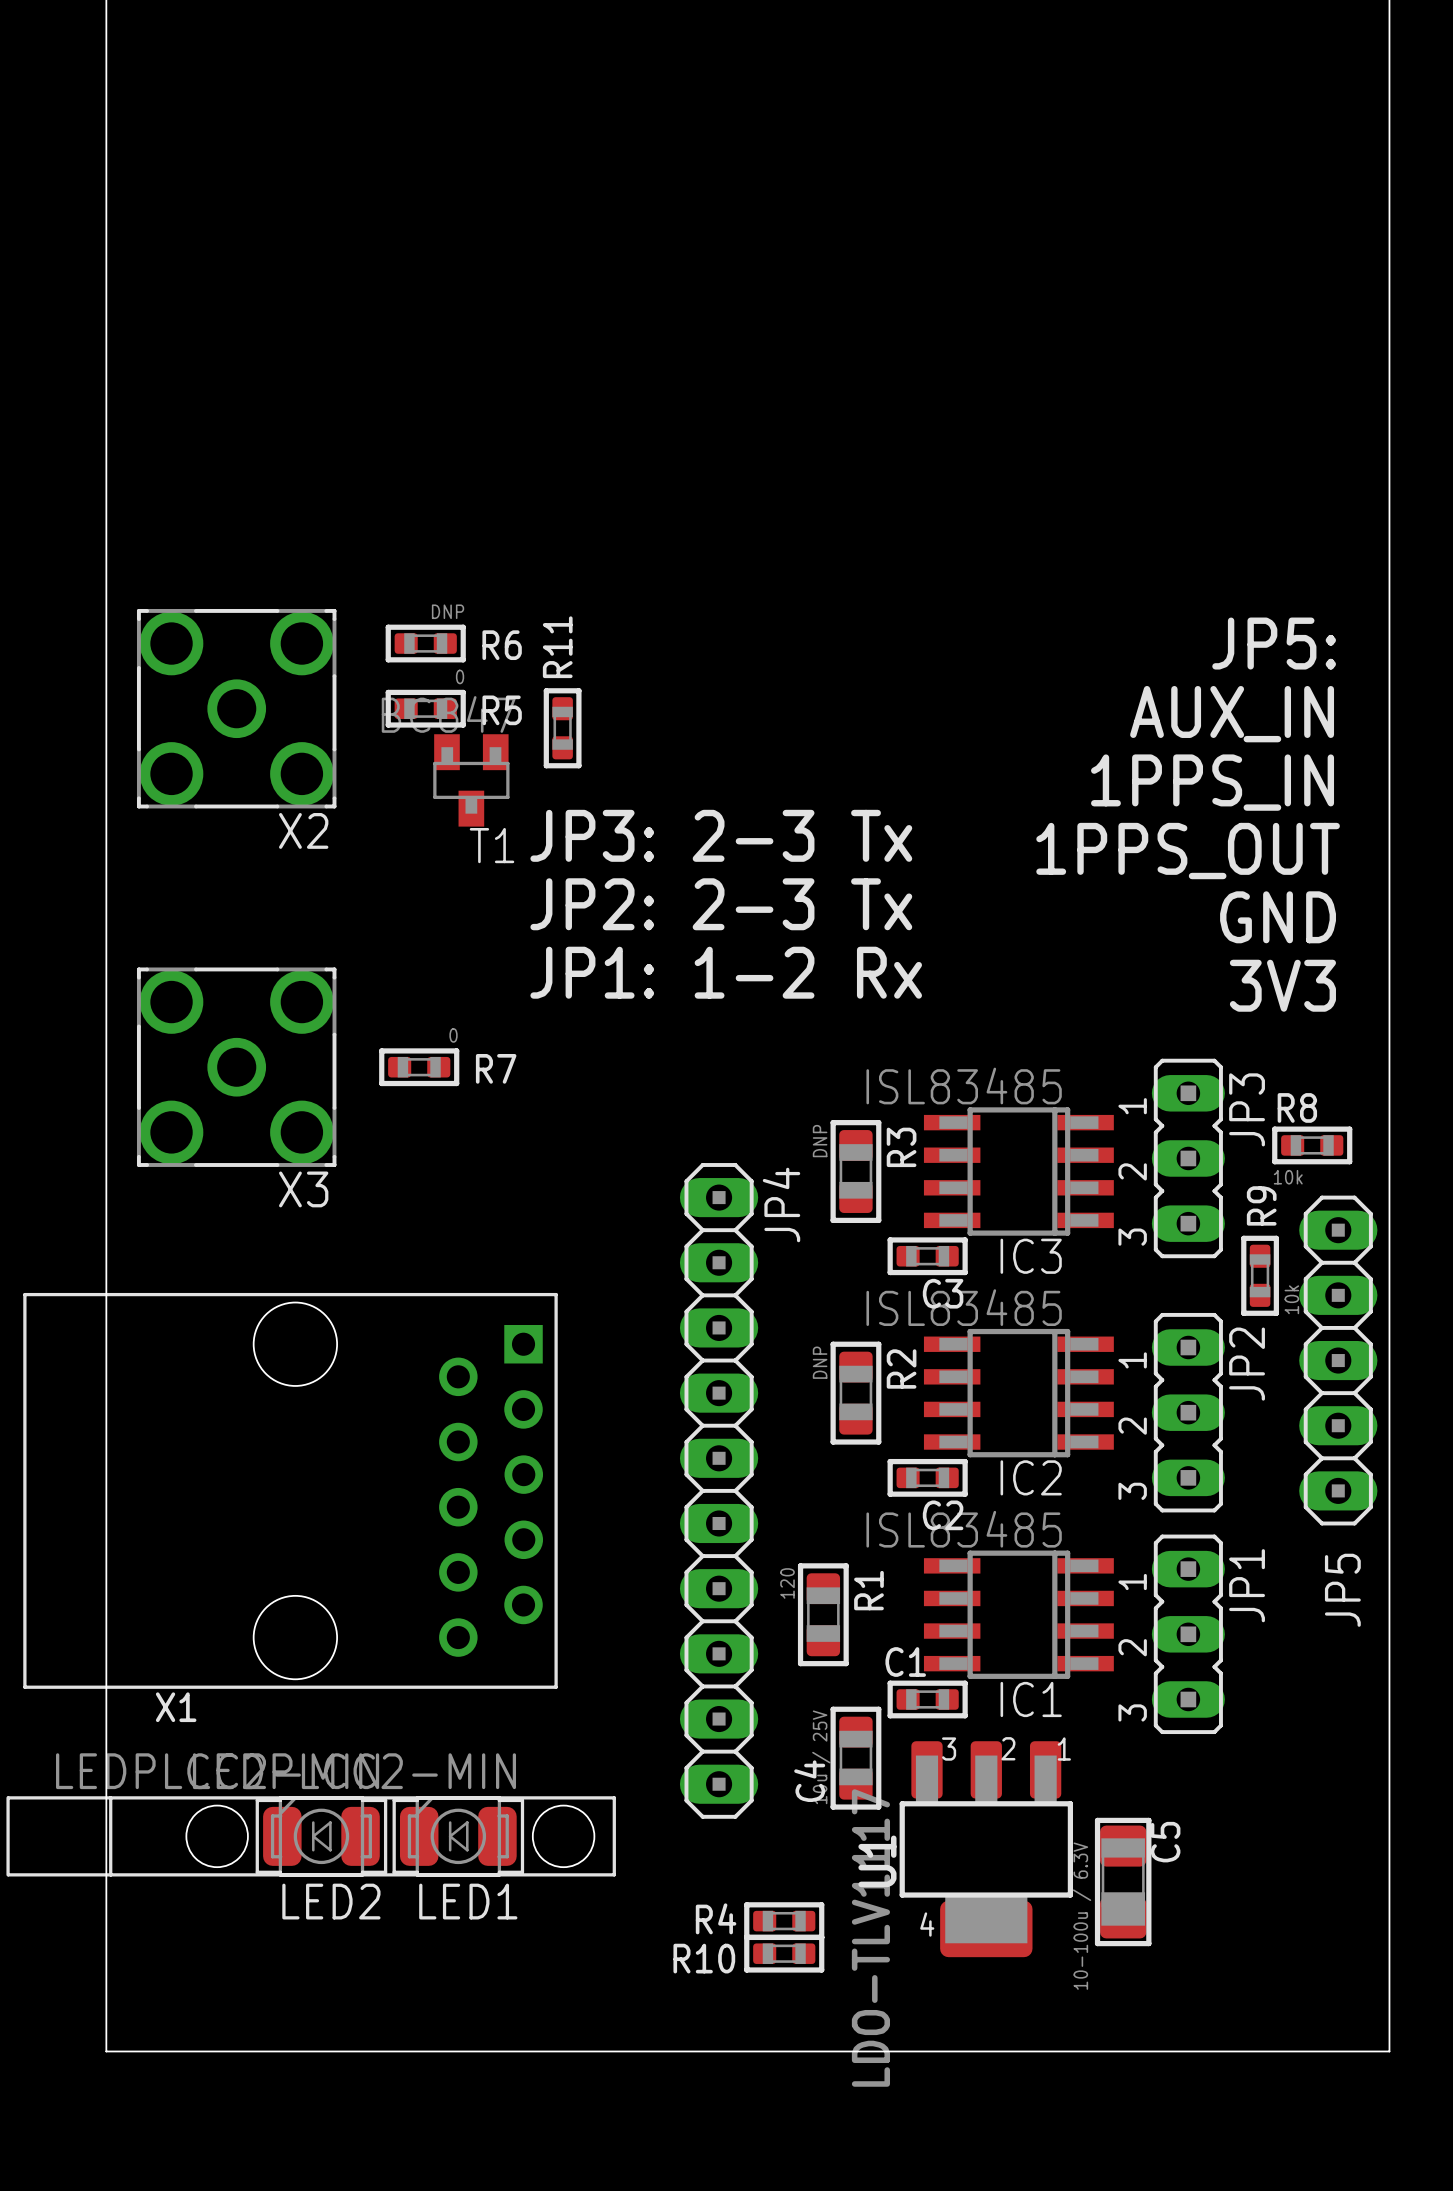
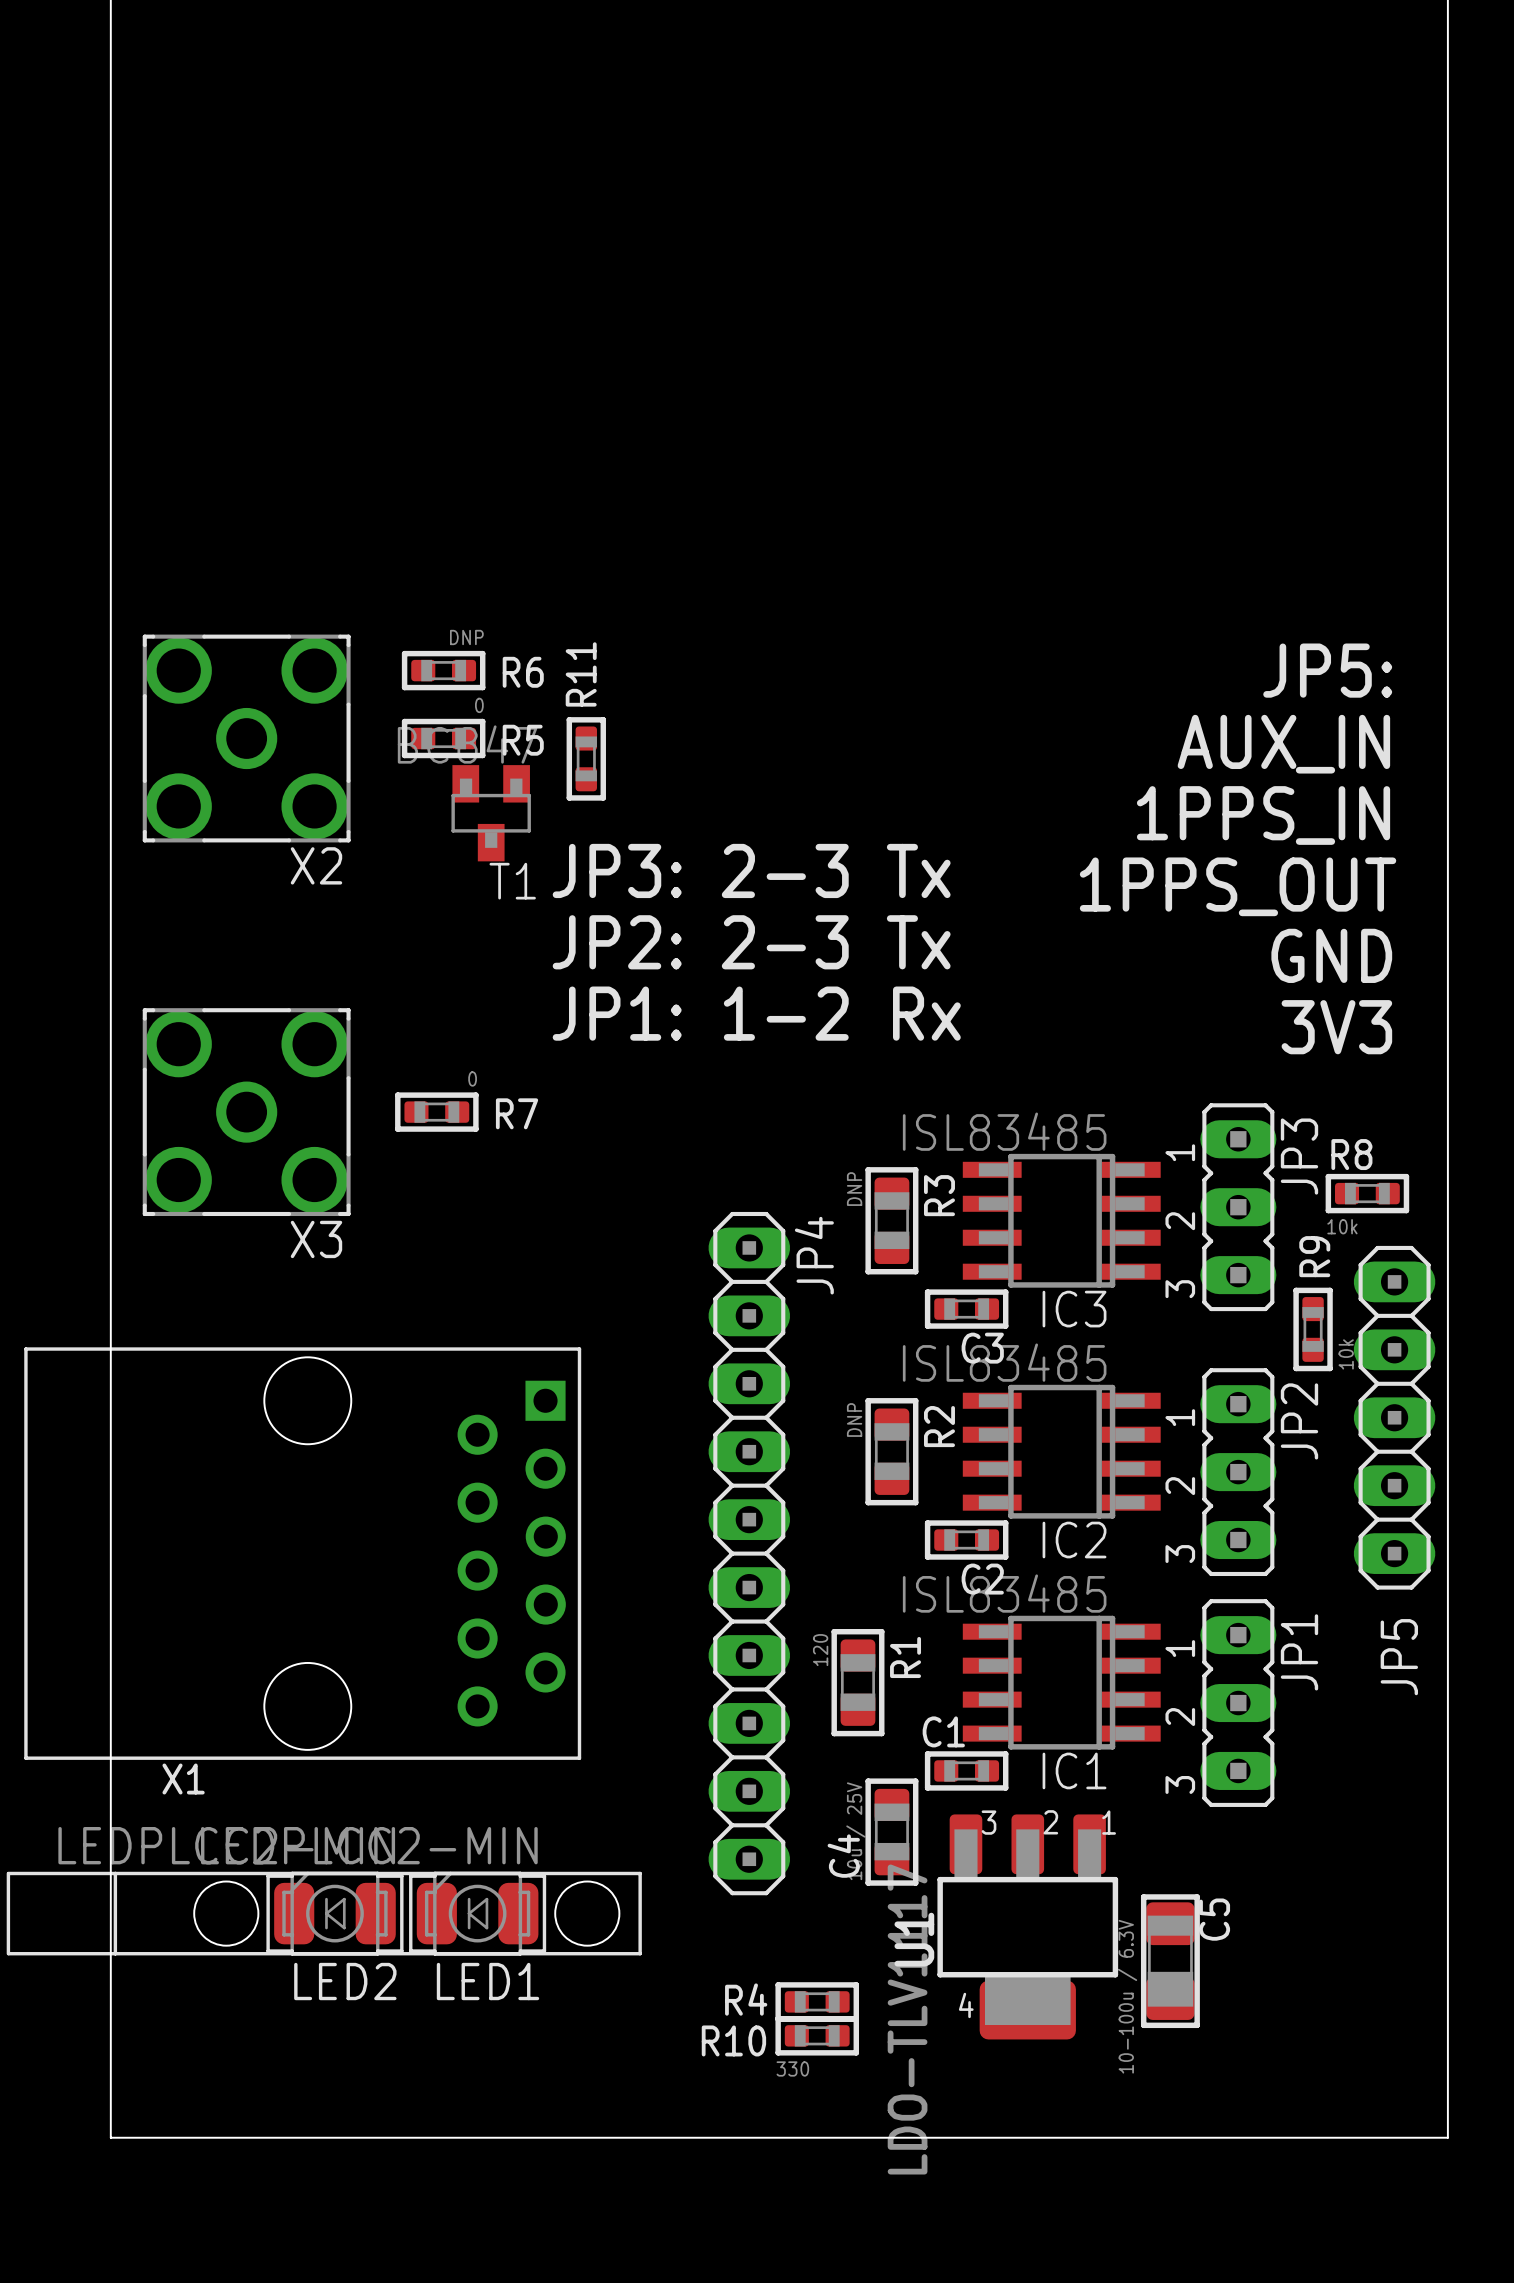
R10 value: none -> 330 (792, 2068)

